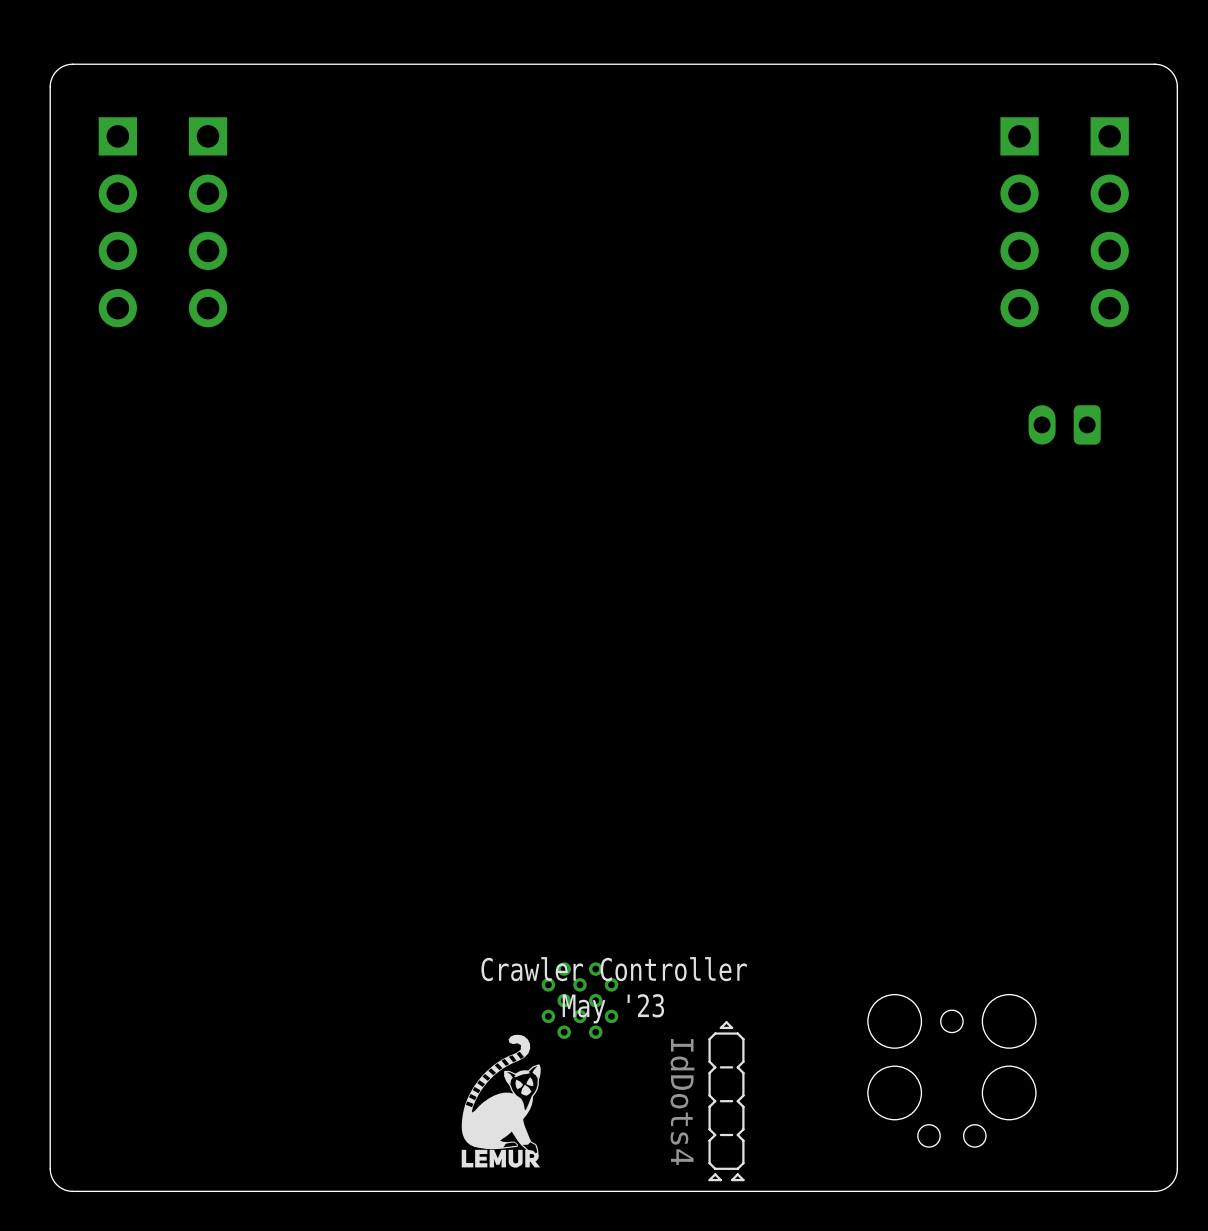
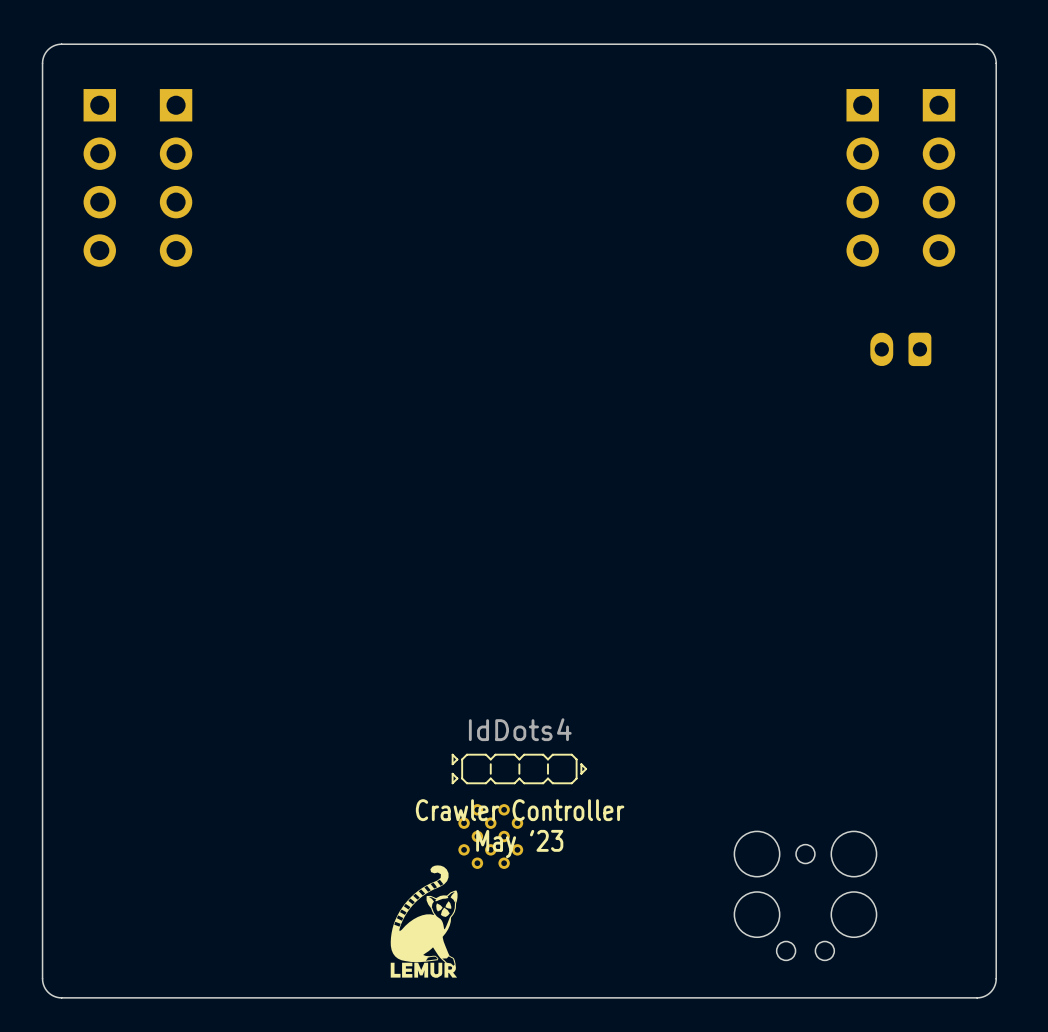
drawing: none -> [451, 753, 588, 785]
drawing: [708, 1021, 745, 1182] -> none

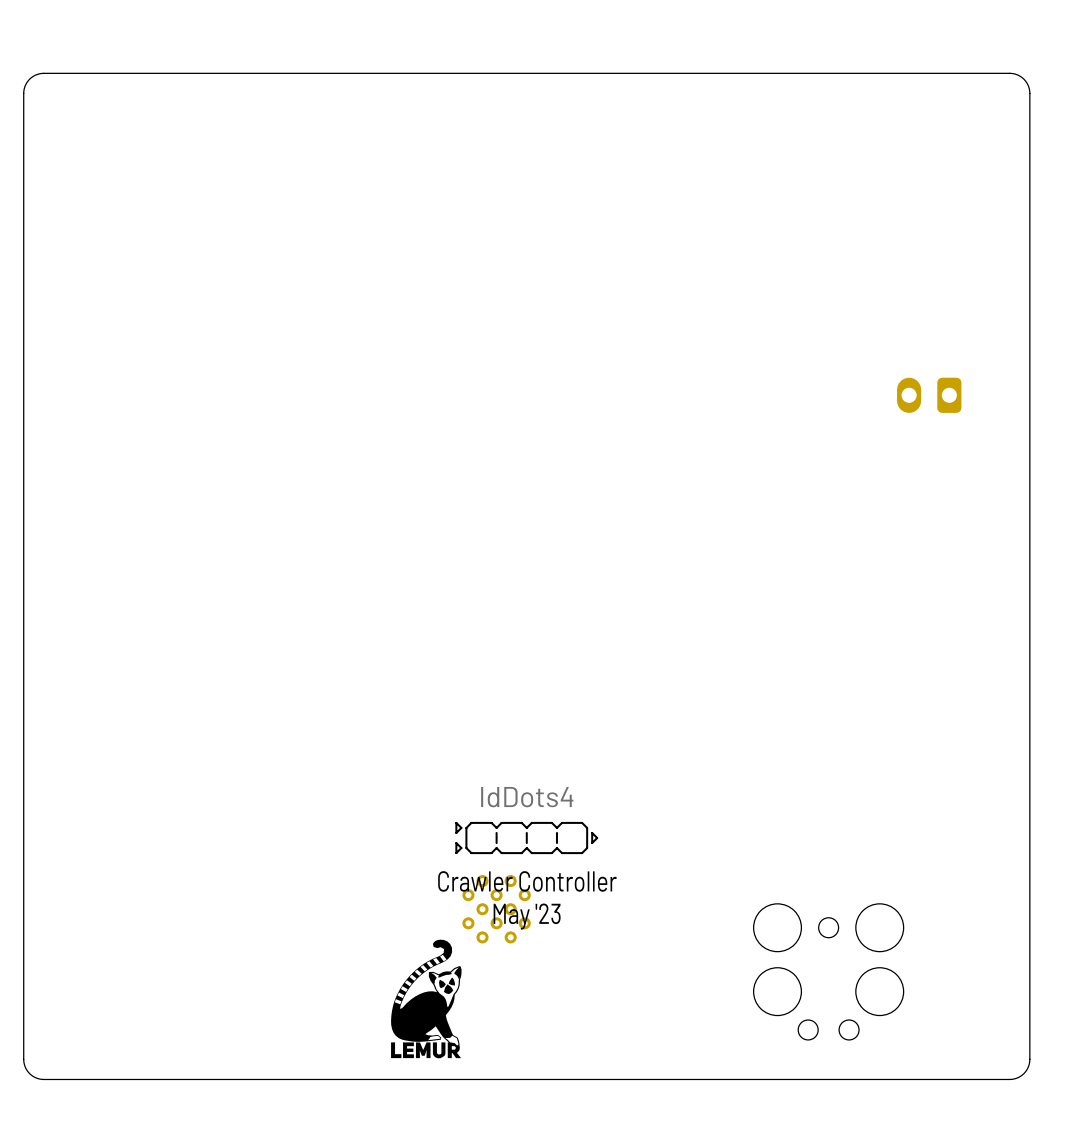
part: (99, 177) -> none
part: (176, 177) -> none
part: (862, 177) -> none
part: (938, 177) -> none

